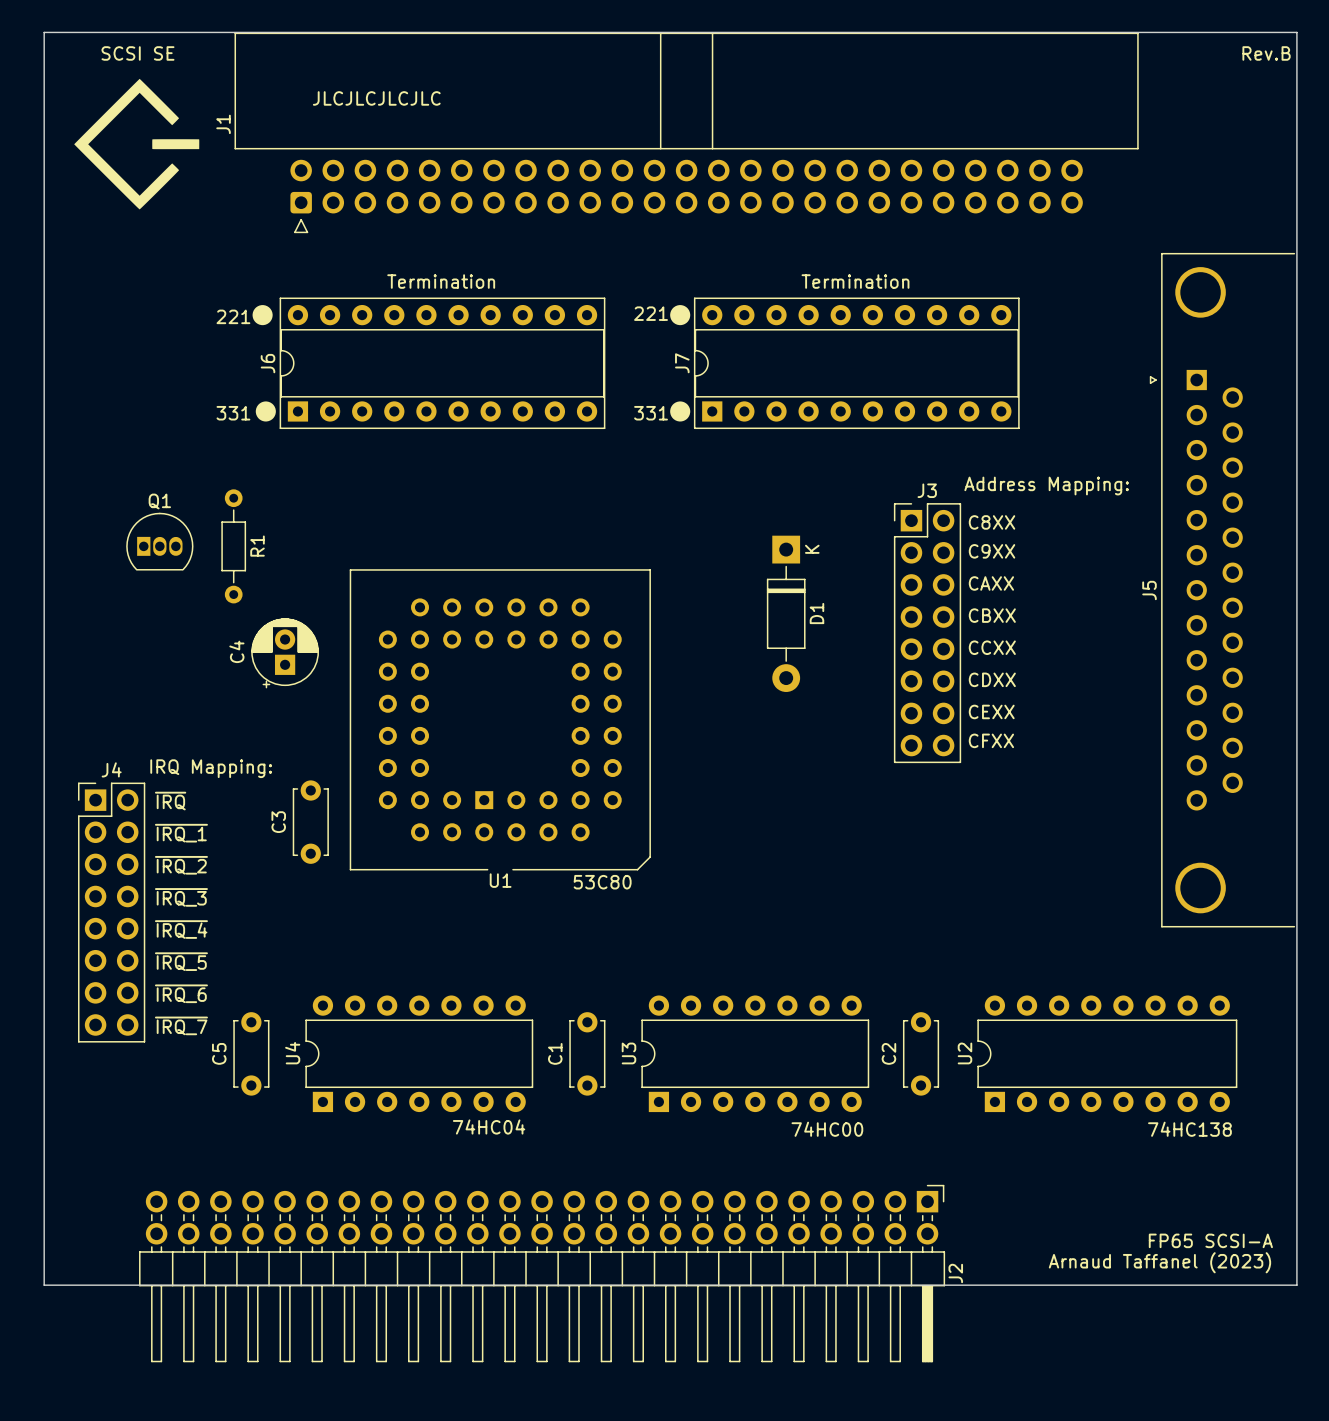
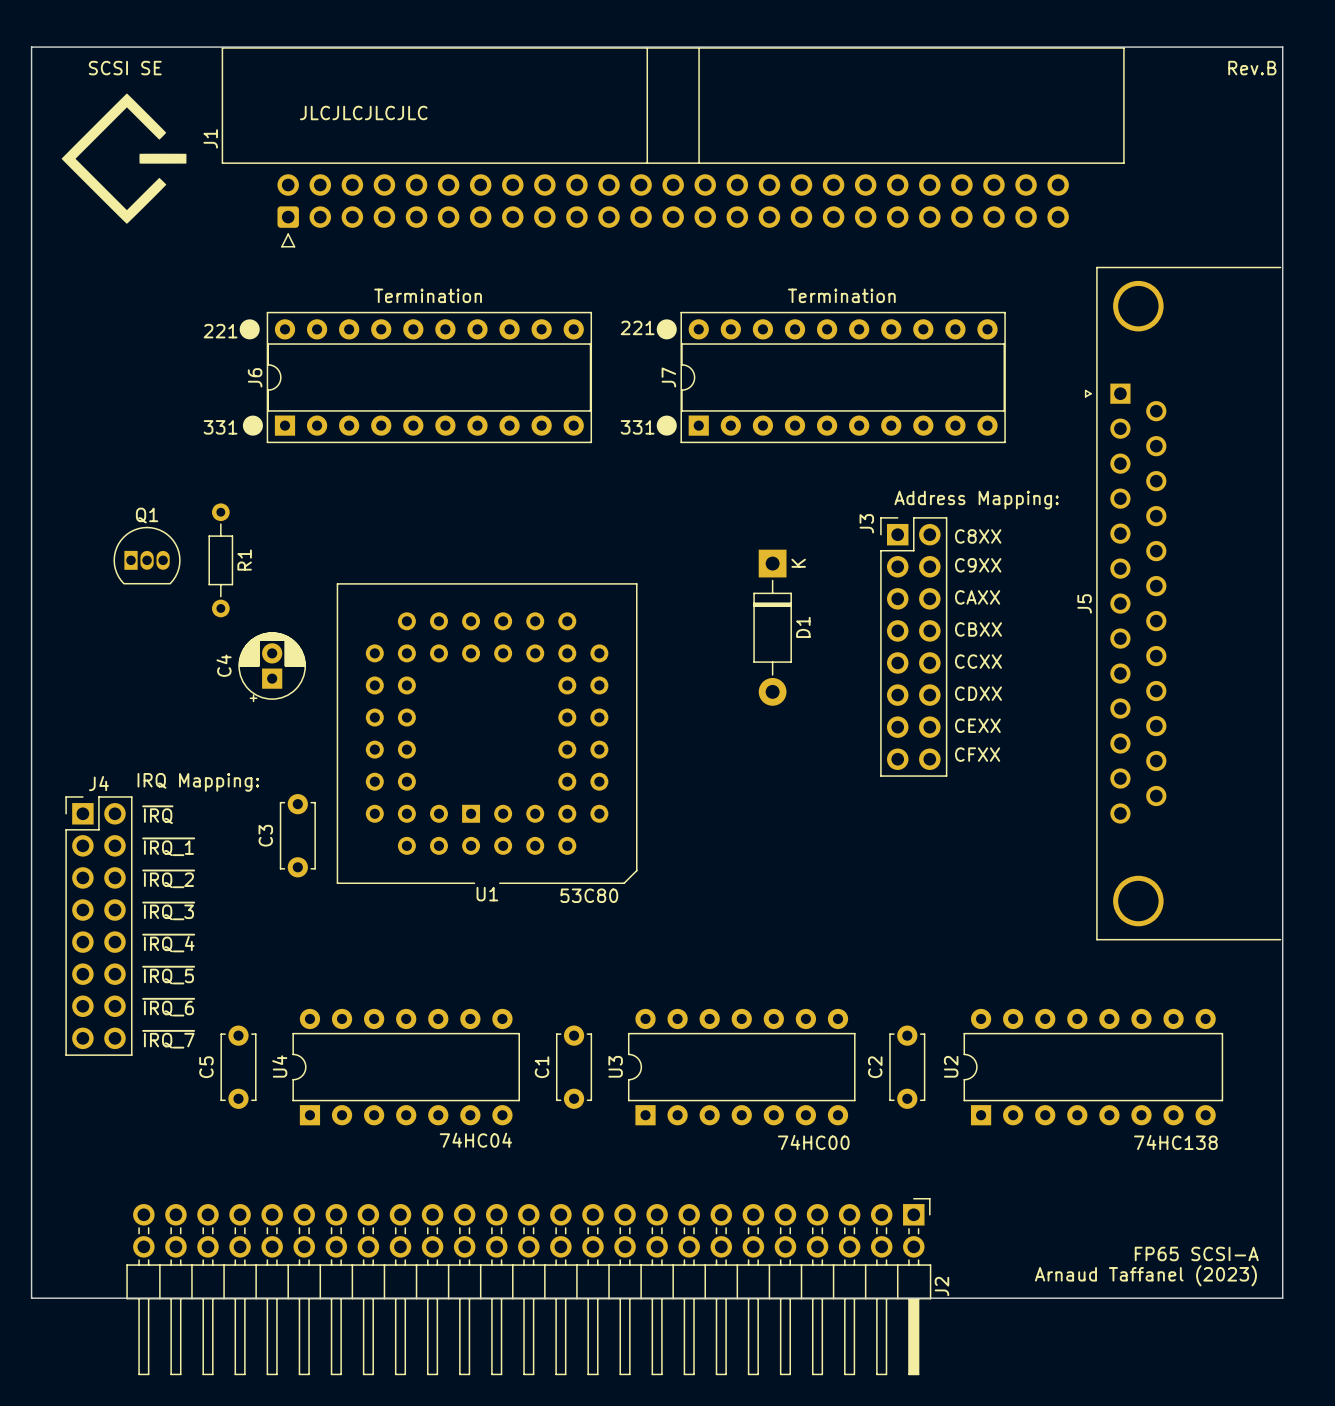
J5 footprint: [1149, 252, 1296, 928] -> [1084, 266, 1282, 941]
text position: Address Mapping: (1046, 486) -> Address Mapping: (976, 500)
J3 name rotation: 0° (927, 490) -> 90° counterclockwise (866, 523)
J3 name position: J3 (927, 490) -> J3 (866, 523)
J5 name position: J5 (1149, 590) -> J5 (1084, 603)

